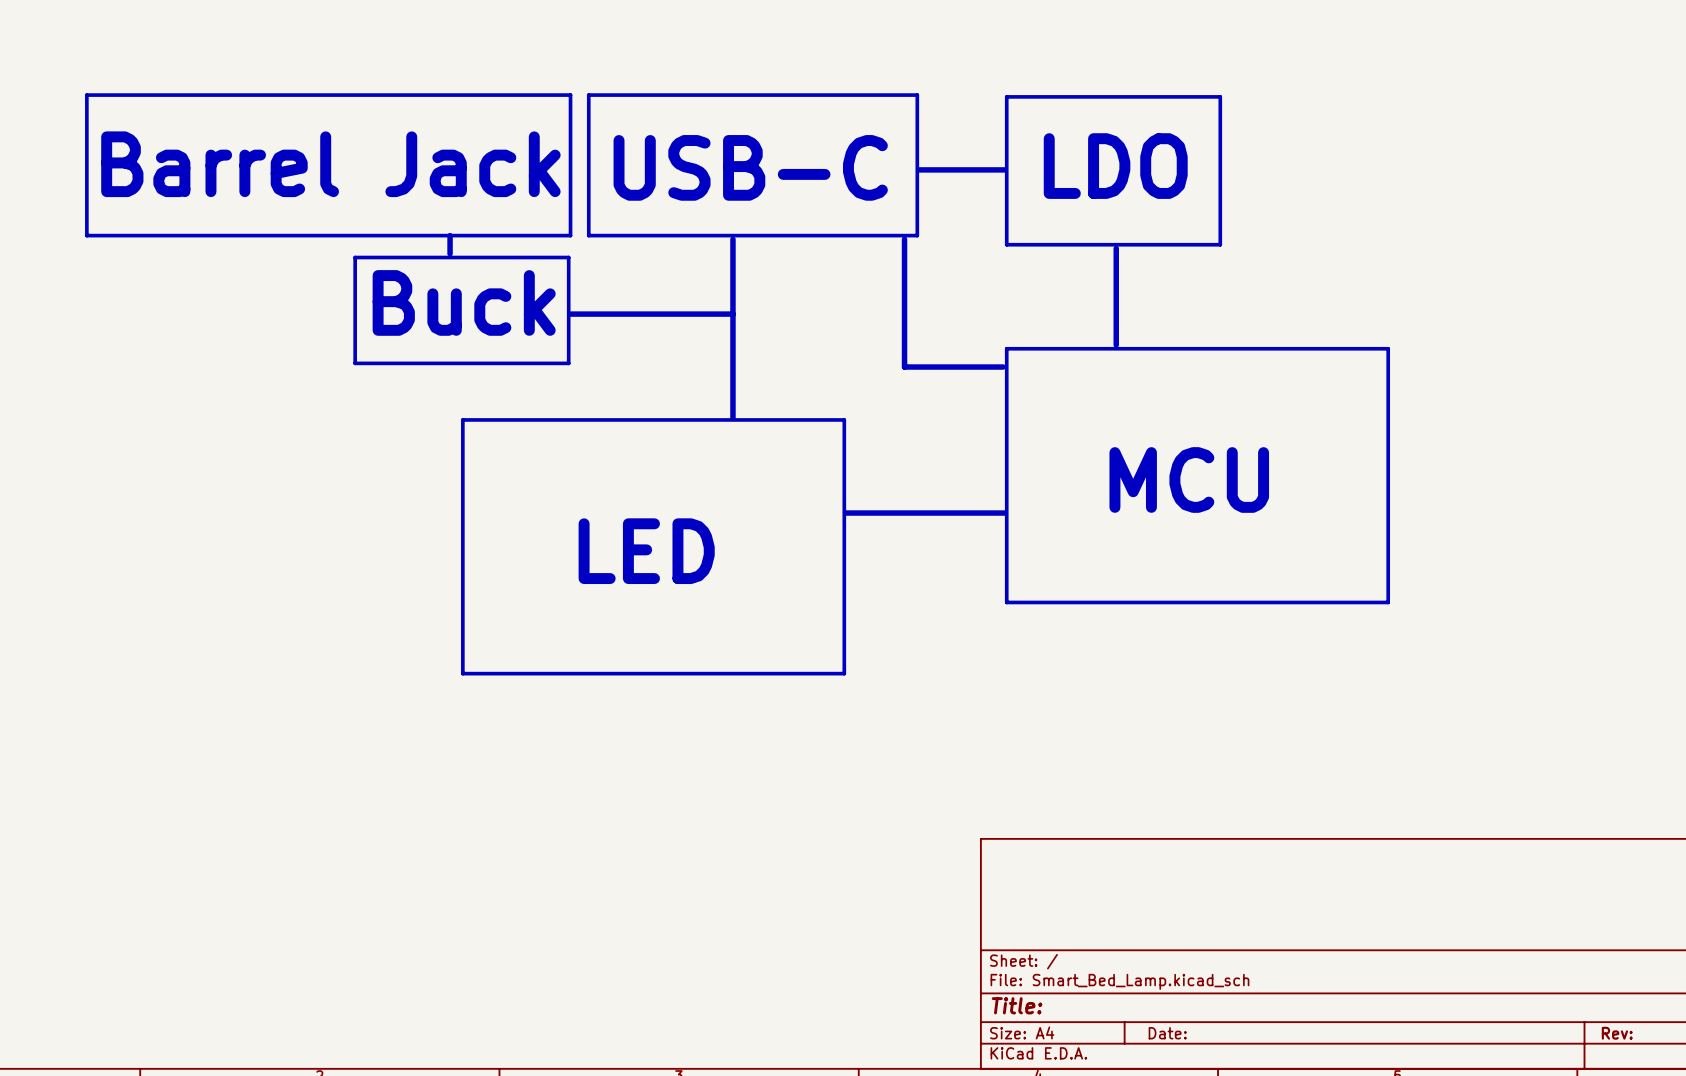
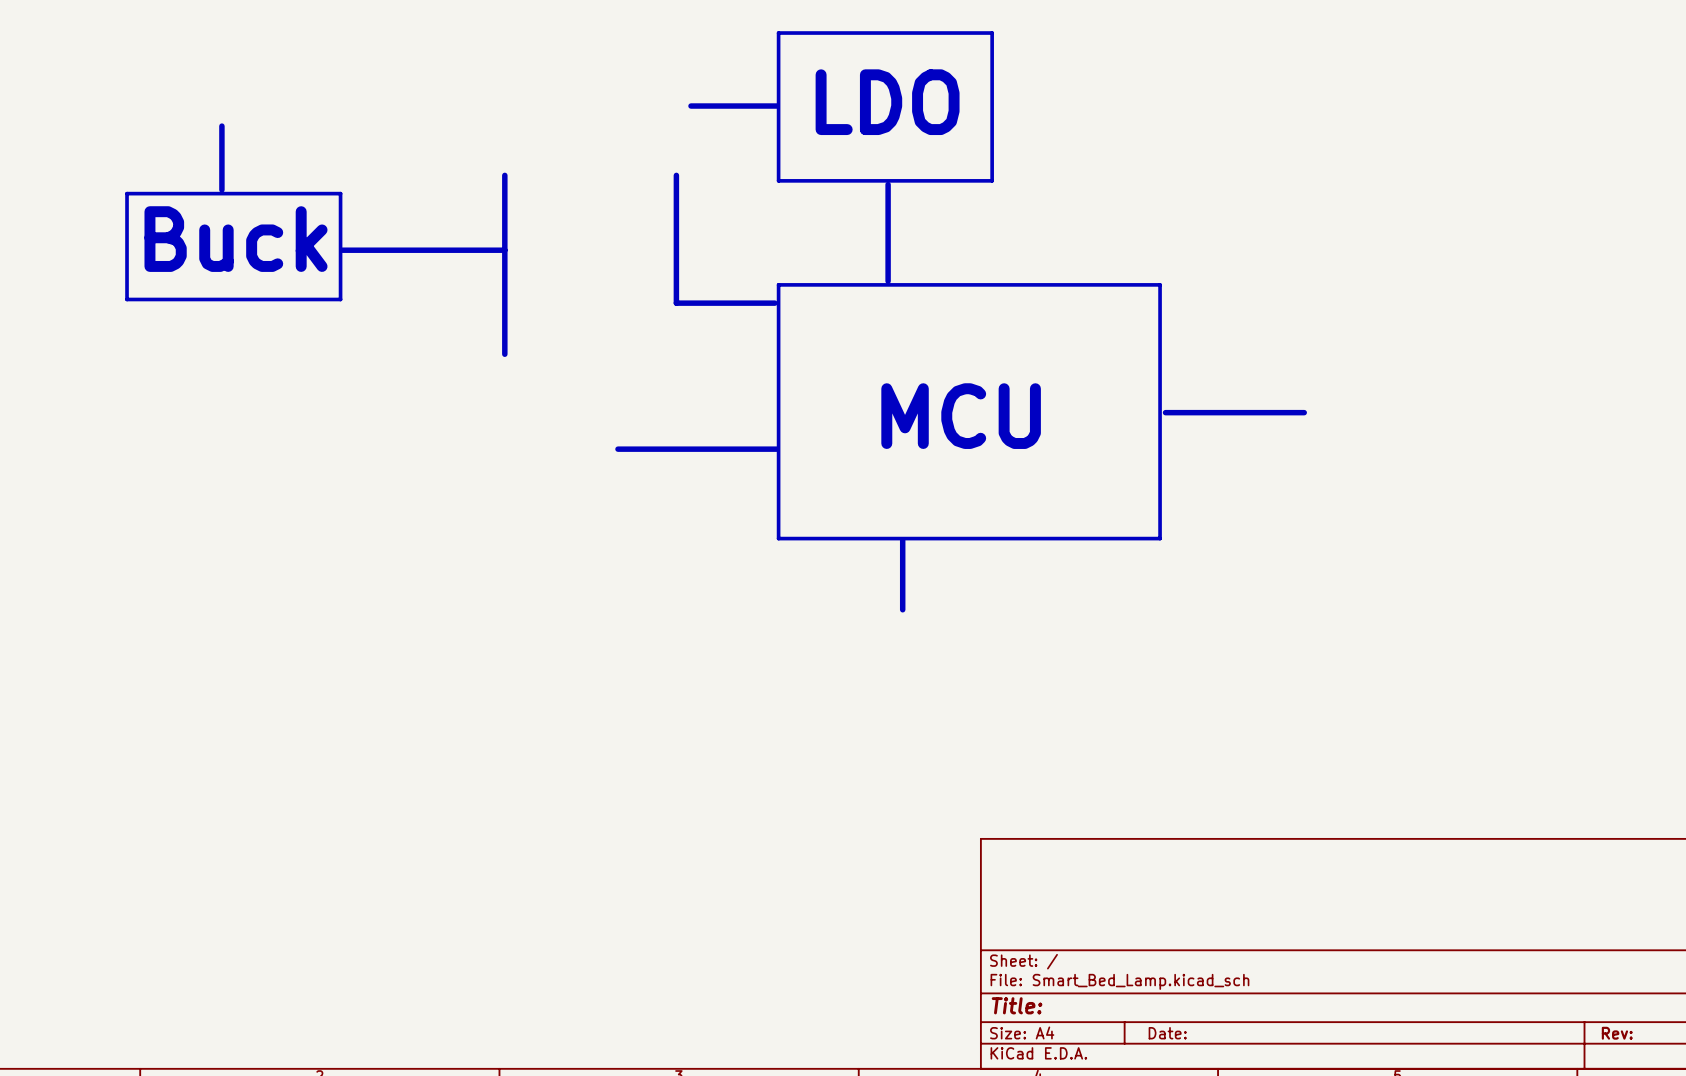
line: none -> (778, 33) (778, 180) (992, 180) (992, 33) (778, 33)
line: (86, 95) (570, 95) (570, 235) (86, 235) (86, 95) -> none
line: (588, 95) (917, 95) (917, 235) (588, 235) (588, 95) -> none
line: (1006, 96) (1006, 244) (1220, 244) (1220, 96) (1006, 96) -> none
text: none -> LDO (887, 102)
line: none -> (690, 106) (776, 106)
line: none -> (221, 126) (221, 189)
text: Barrel Jack (330, 164) -> none
text: LDO (1115, 166) -> none
text: USB-C (750, 167) -> none
line: (919, 169) (1004, 169) -> none
line: none -> (504, 175) (504, 354)
line: none -> (676, 175) (676, 303) (774, 303)
line: none -> (888, 184) (888, 281)
line: none -> (127, 193) (340, 193) (340, 299) (127, 299) (127, 193)
line: (450, 235) (450, 253) -> none
text: none -> Buck (236, 239)
line: (732, 239) (732, 418) -> none
line: (904, 239) (904, 367) (1003, 367) -> none
line: (1116, 248) (1116, 345) -> none
line: none -> (342, 250) (504, 250)
line: (355, 257) (568, 257) (568, 363) (355, 363) (355, 257) -> none
line: none -> (778, 284) (1160, 284) (1160, 538) (778, 538) (778, 284)
text: Buck (464, 302) -> none
line: (570, 314) (732, 314) -> none
line: (1006, 348) (1388, 348) (1388, 602) (1006, 602) (1006, 348) -> none
line: none -> (1165, 412) (1304, 412)
text: none -> MCU (961, 416)
line: (462, 419) (844, 419) (844, 673) (462, 673) (462, 419) -> none
line: none -> (617, 449) (776, 449)
text: MCU (1189, 479) -> none
line: (846, 513) (1004, 513) -> none
line: none -> (902, 540) (902, 609)
text: LED (646, 551) -> none

